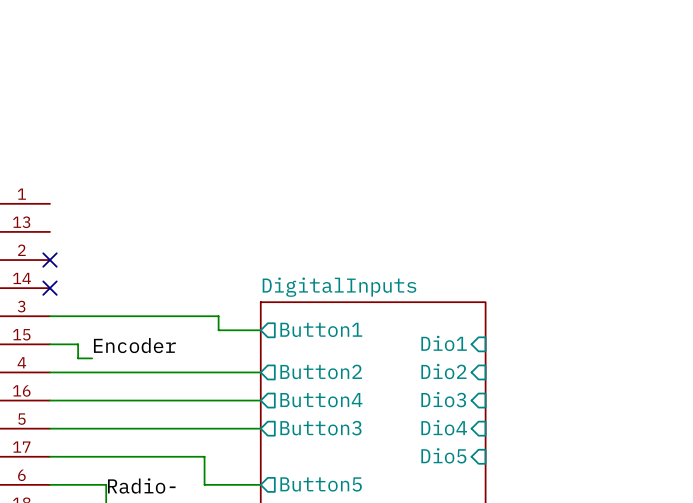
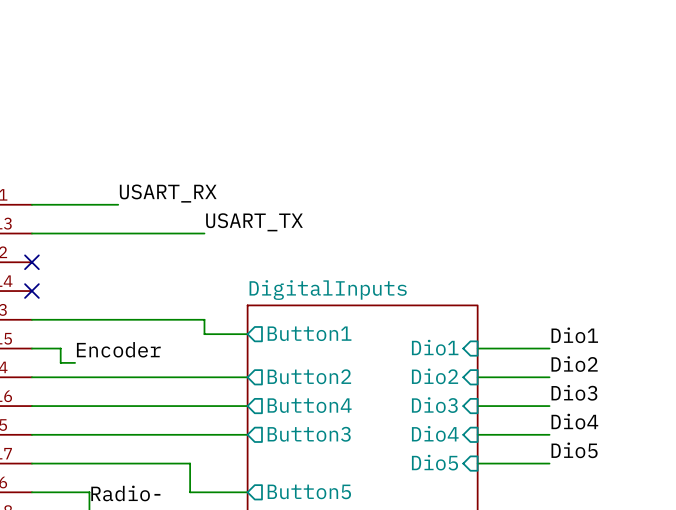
label: none -> USART_RX (168, 193)
wire: none -> (31, 204) (118, 204)
label: none -> USART_TX (254, 222)
wire: none -> (31, 233) (204, 233)
label: none -> Dio1 (574, 335)
wire: none -> (477, 348) (549, 348)
label: none -> Dio2 (574, 364)
wire: none -> (477, 377) (549, 377)
label: none -> Dio3 (574, 392)
wire: none -> (477, 406) (549, 406)
label: none -> Dio4 (574, 421)
wire: none -> (477, 434) (549, 434)
label: none -> Dio5 (574, 450)
wire: none -> (477, 463) (549, 463)

